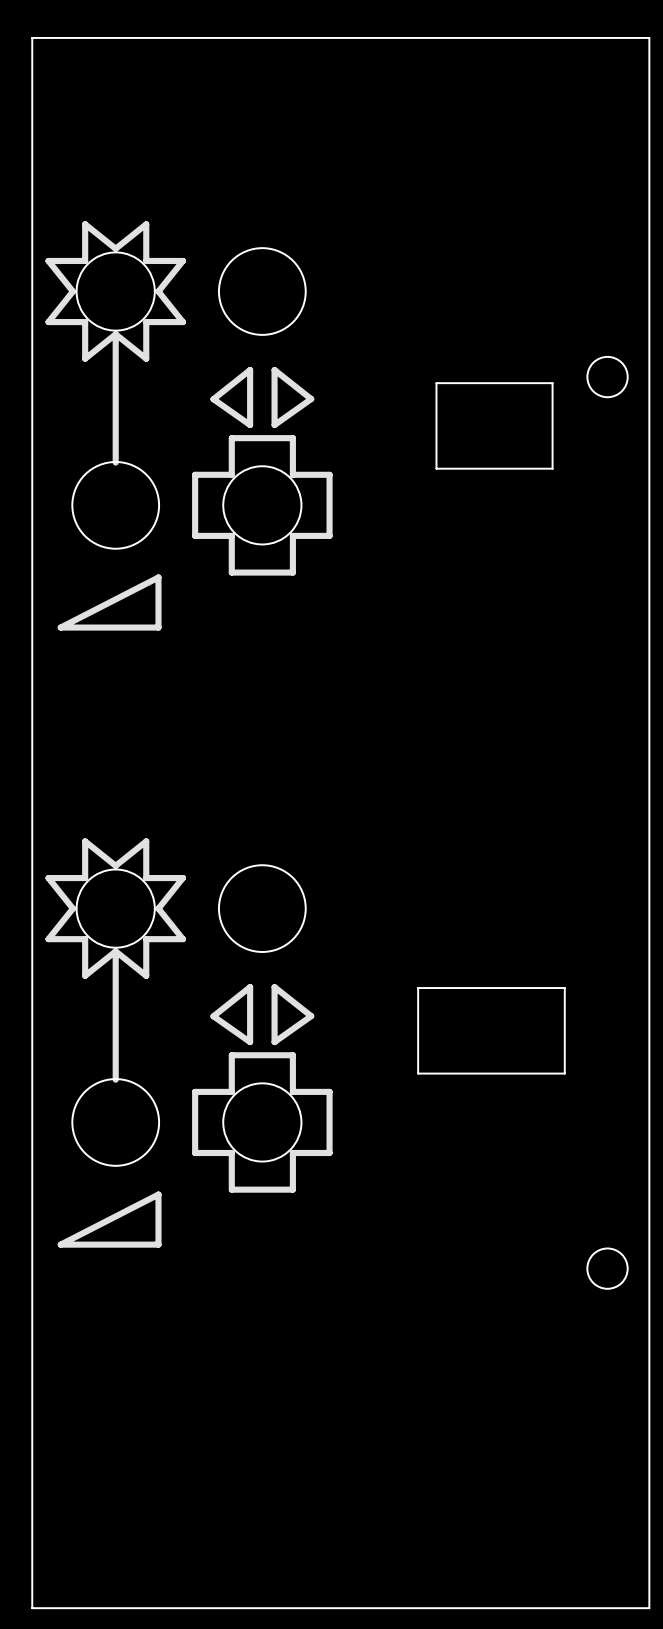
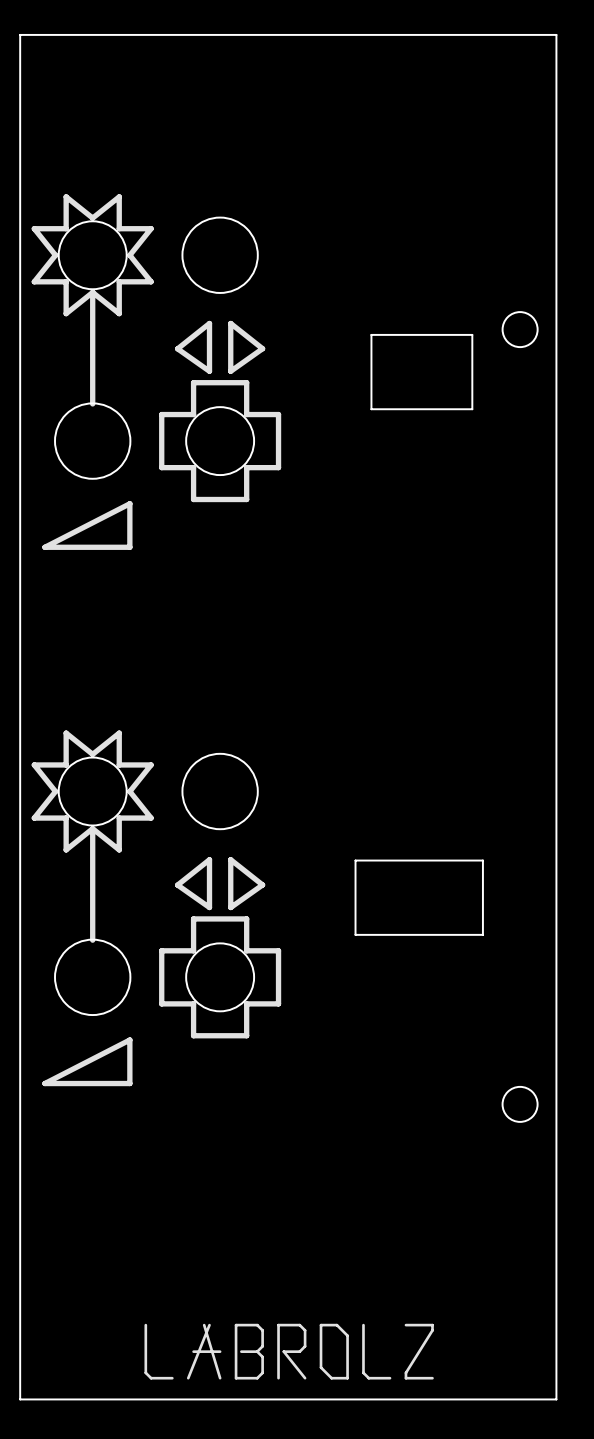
line: none -> (145, 1325) (145, 1372) (151, 1378) (172, 1378)
line: none -> (204, 1325) (220, 1378)
line: none -> (209, 1325) (188, 1378)
line: none -> (321, 1325) (336, 1325) (347, 1335) (347, 1378) (331, 1378) (321, 1367) (321, 1325)
line: none -> (363, 1325) (363, 1372) (368, 1378) (390, 1378)
line: none -> (405, 1325) (432, 1325) (432, 1330) (405, 1372) (405, 1378) (432, 1378)
line: none -> (193, 1351) (220, 1351)
line: none -> (241, 1351) (257, 1351)
line: none -> (257, 1351) (262, 1346) (262, 1330) (257, 1325) (236, 1325) (236, 1378) (257, 1378) (262, 1372) (262, 1356) (257, 1351)
line: none -> (278, 1378) (278, 1325) (299, 1325) (305, 1330) (305, 1346) (299, 1351) (283, 1351) (305, 1378)

